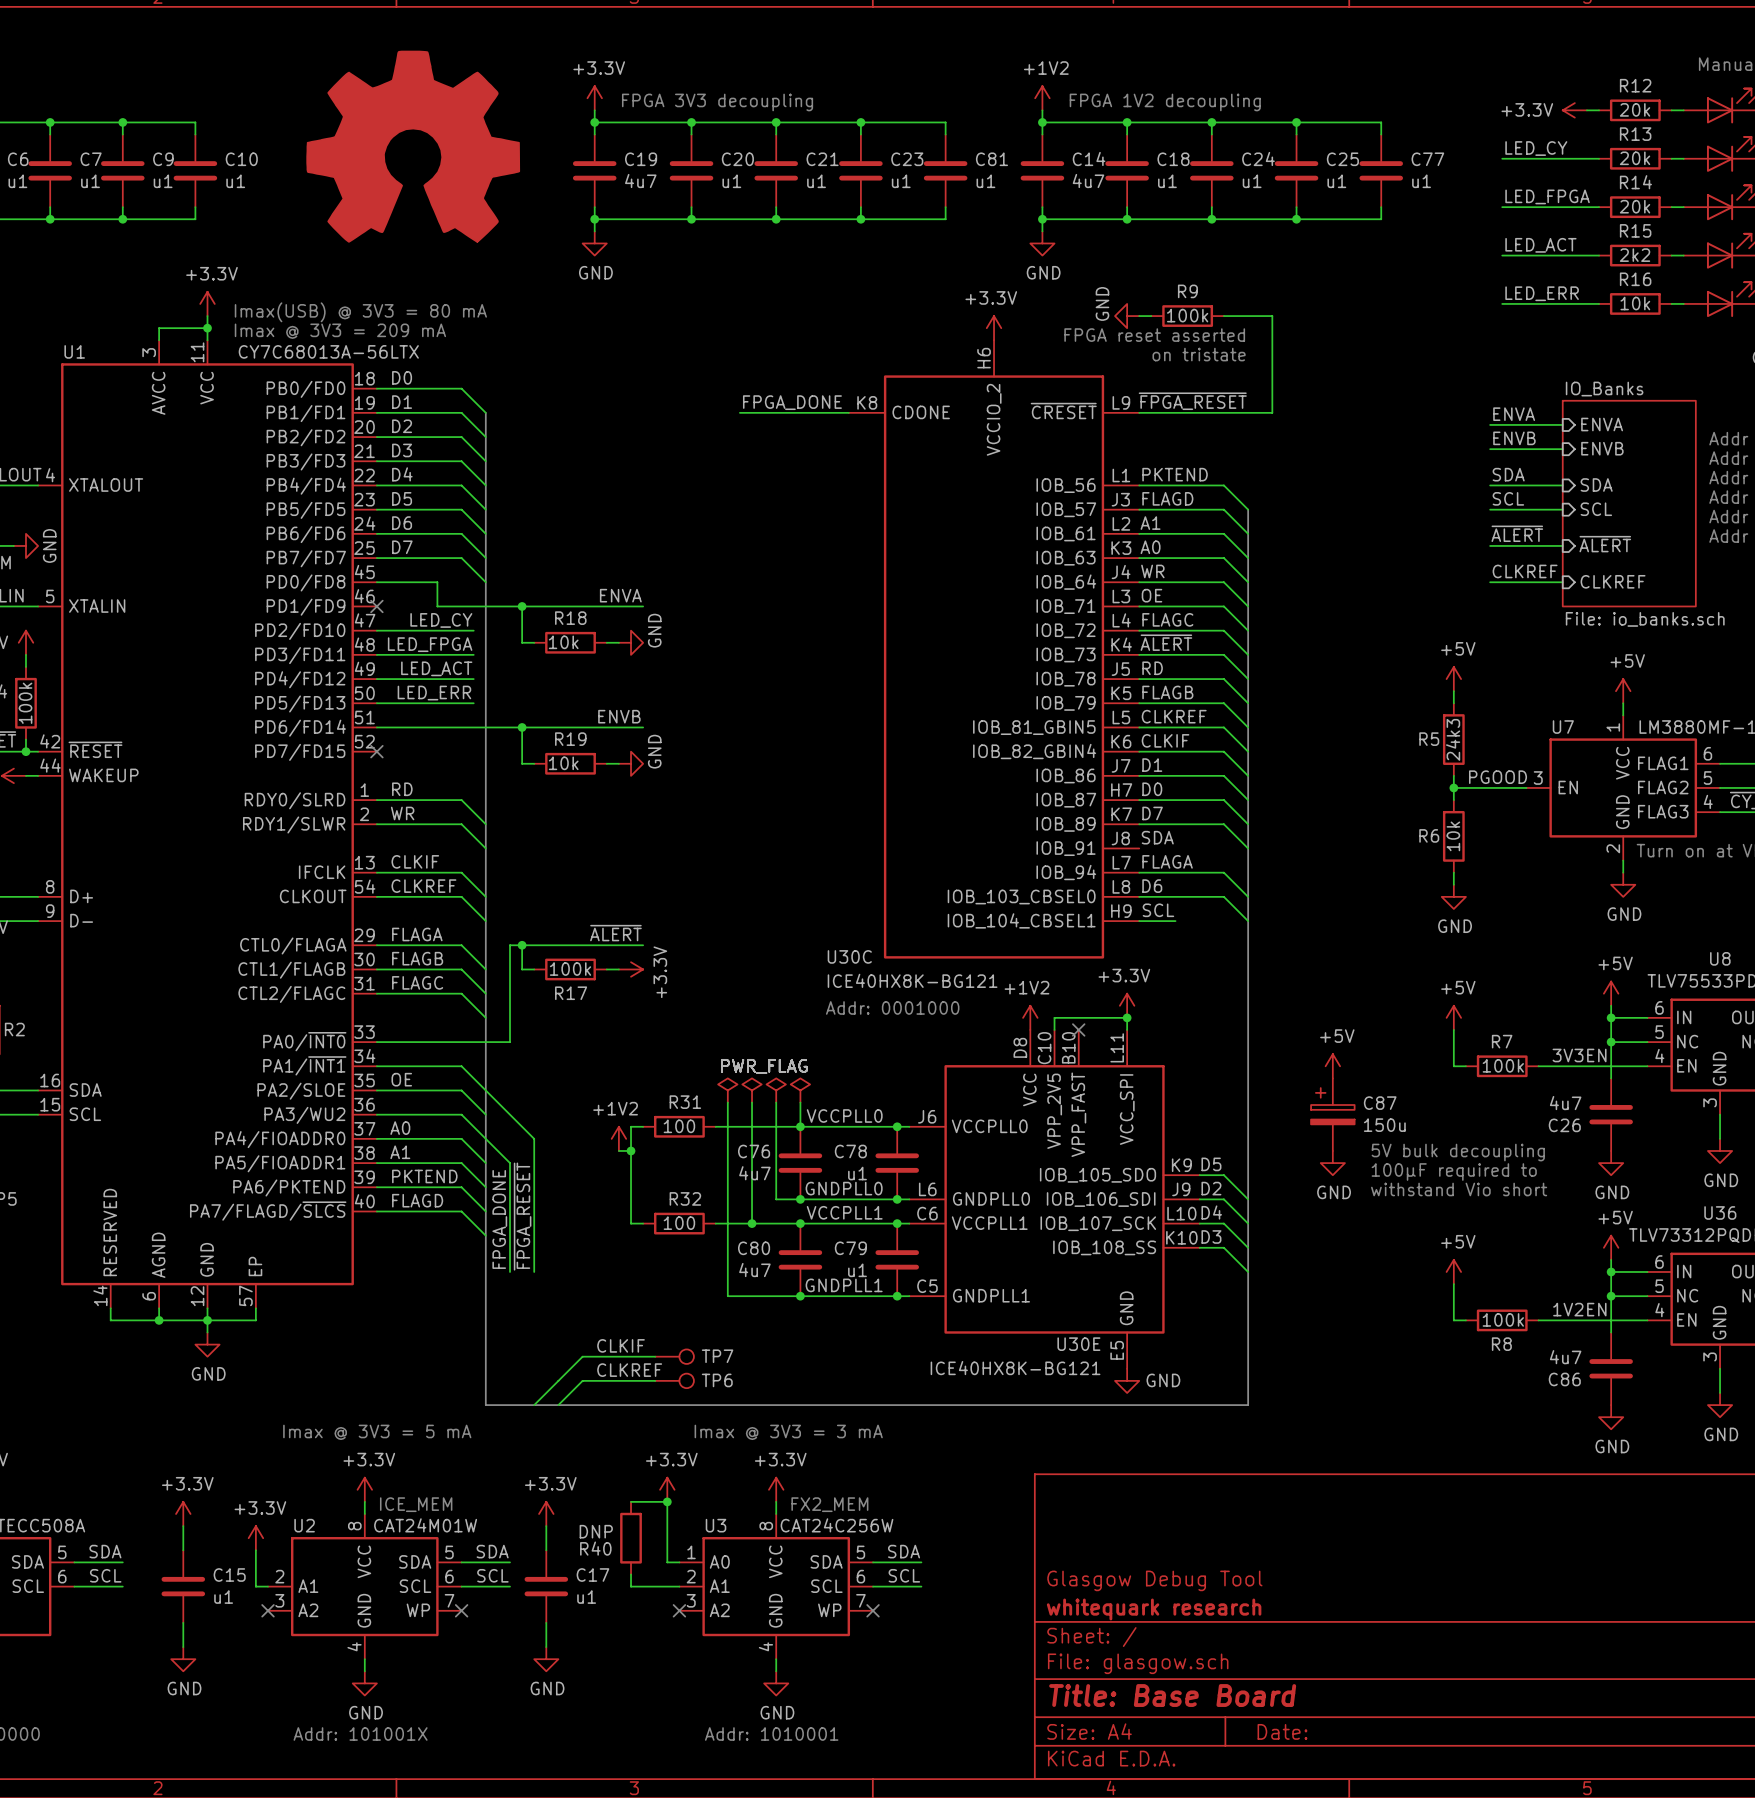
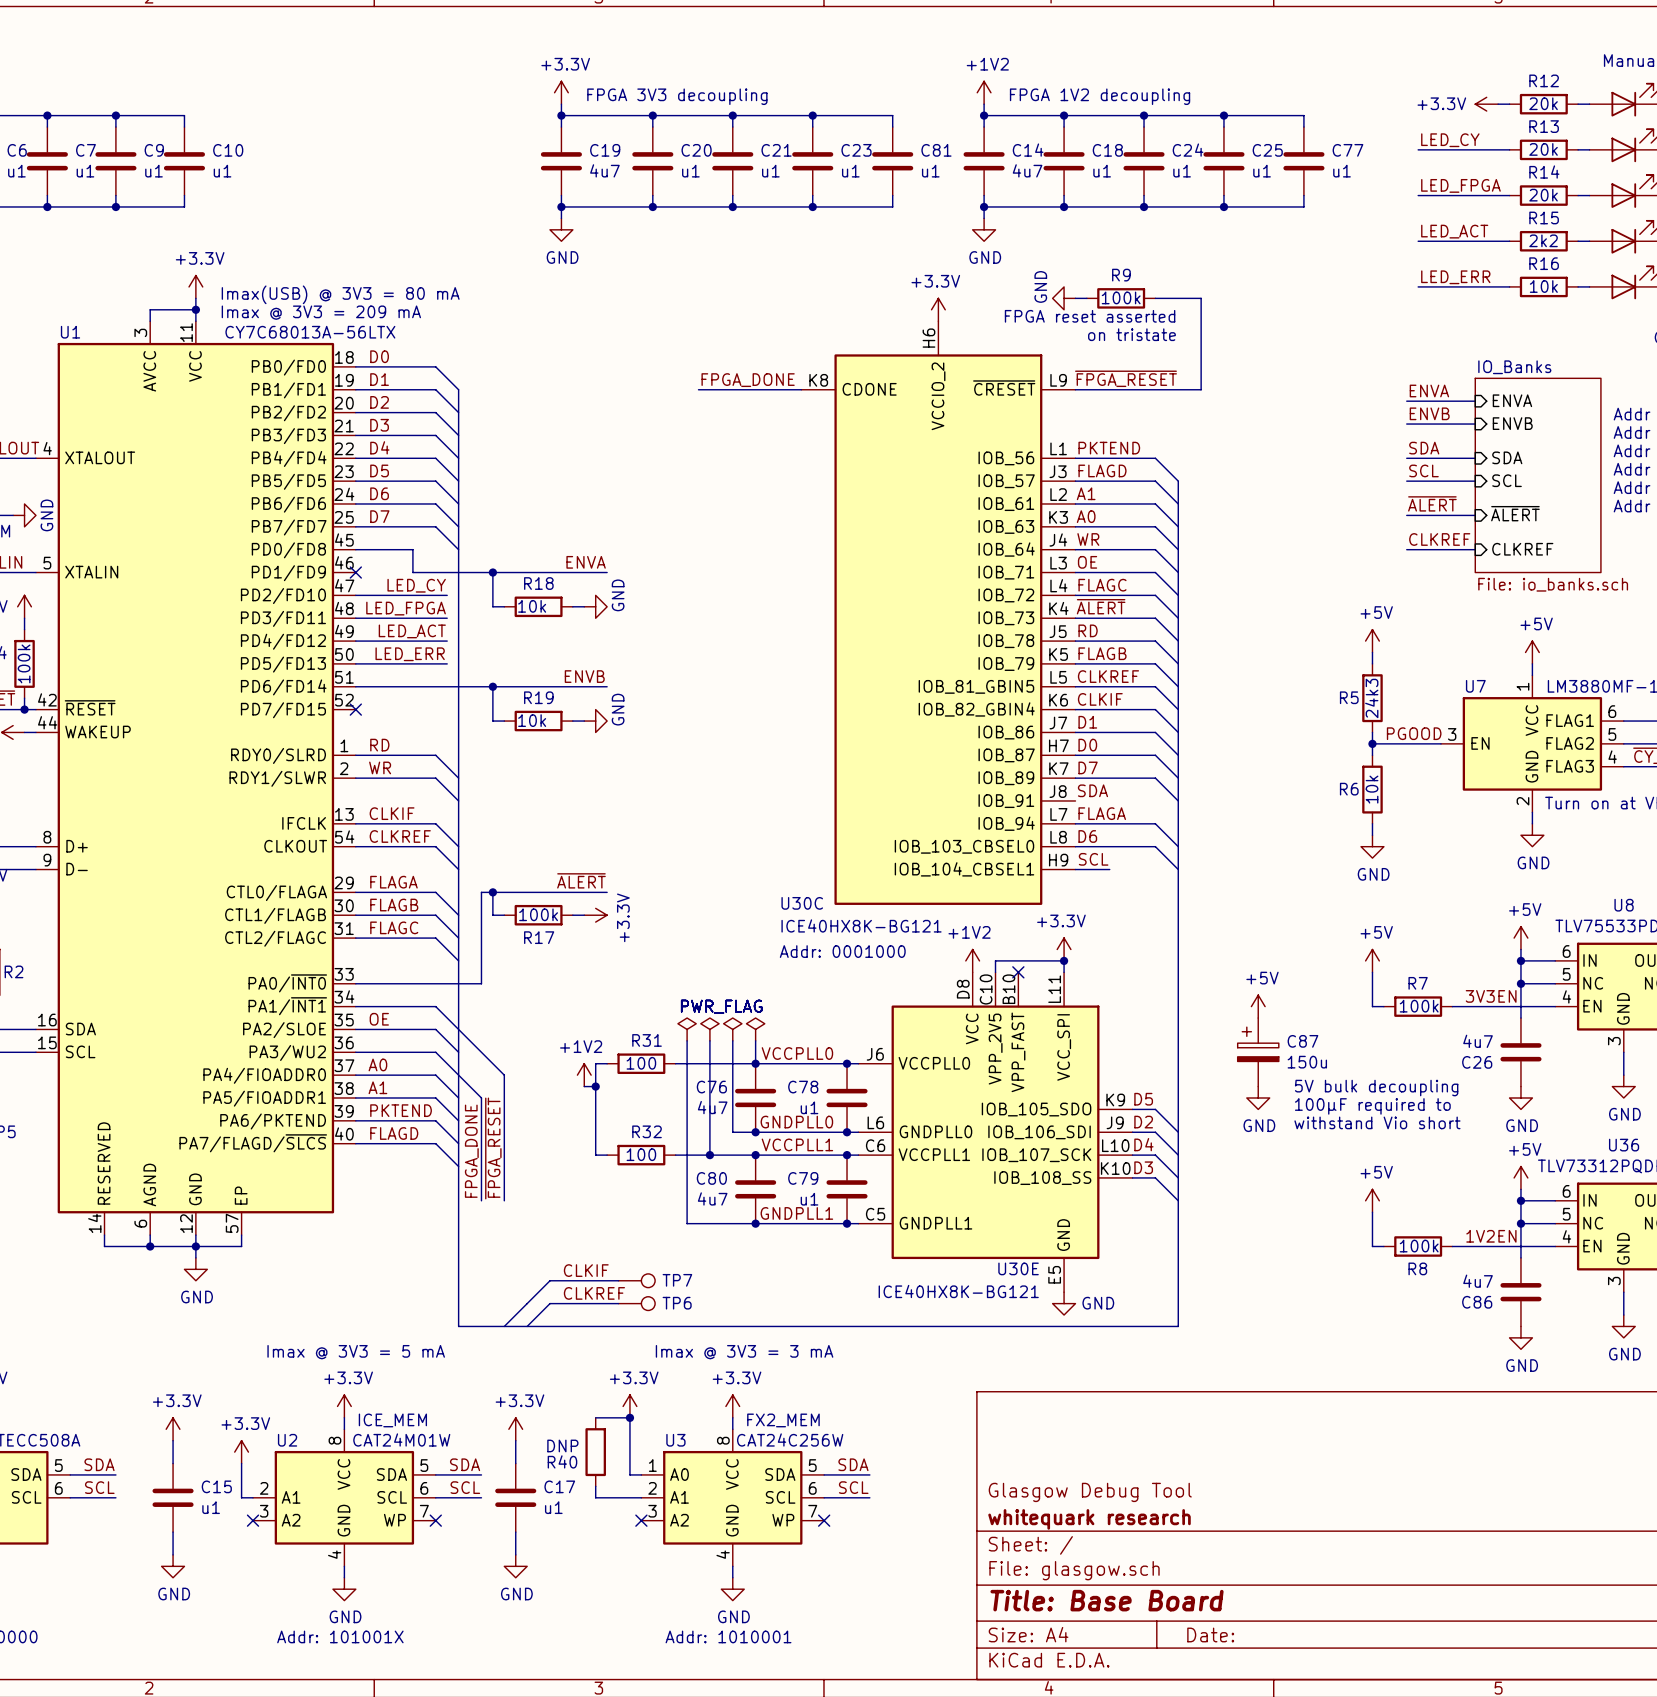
power symbol: (413, 146) -> none

